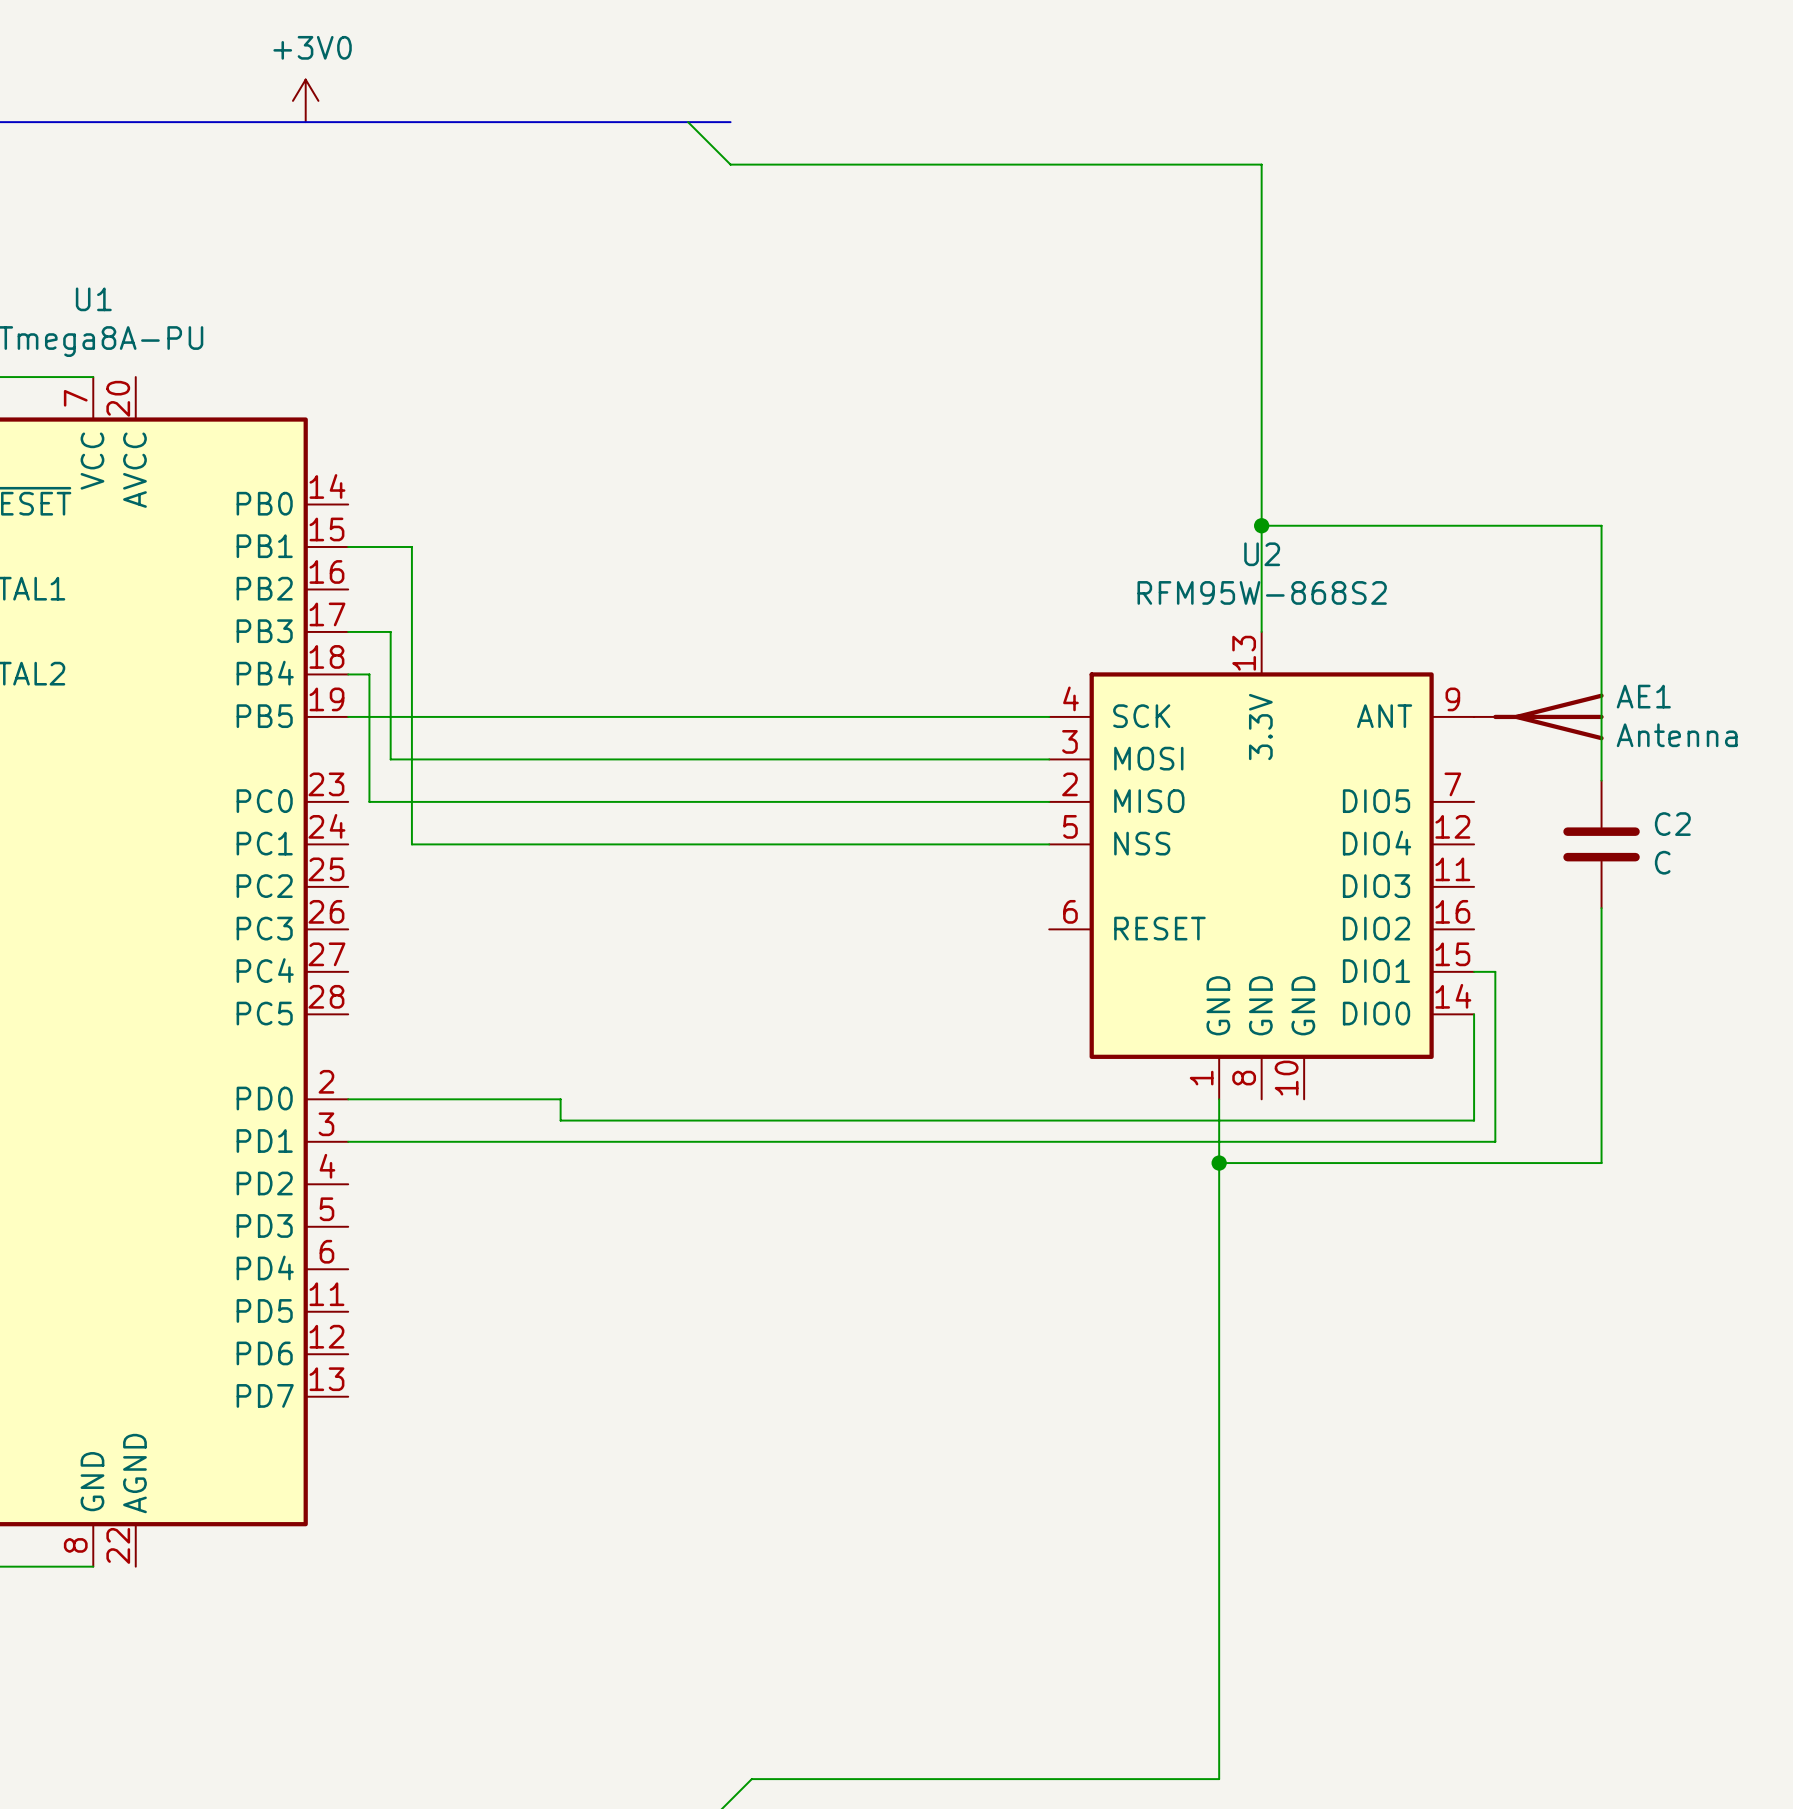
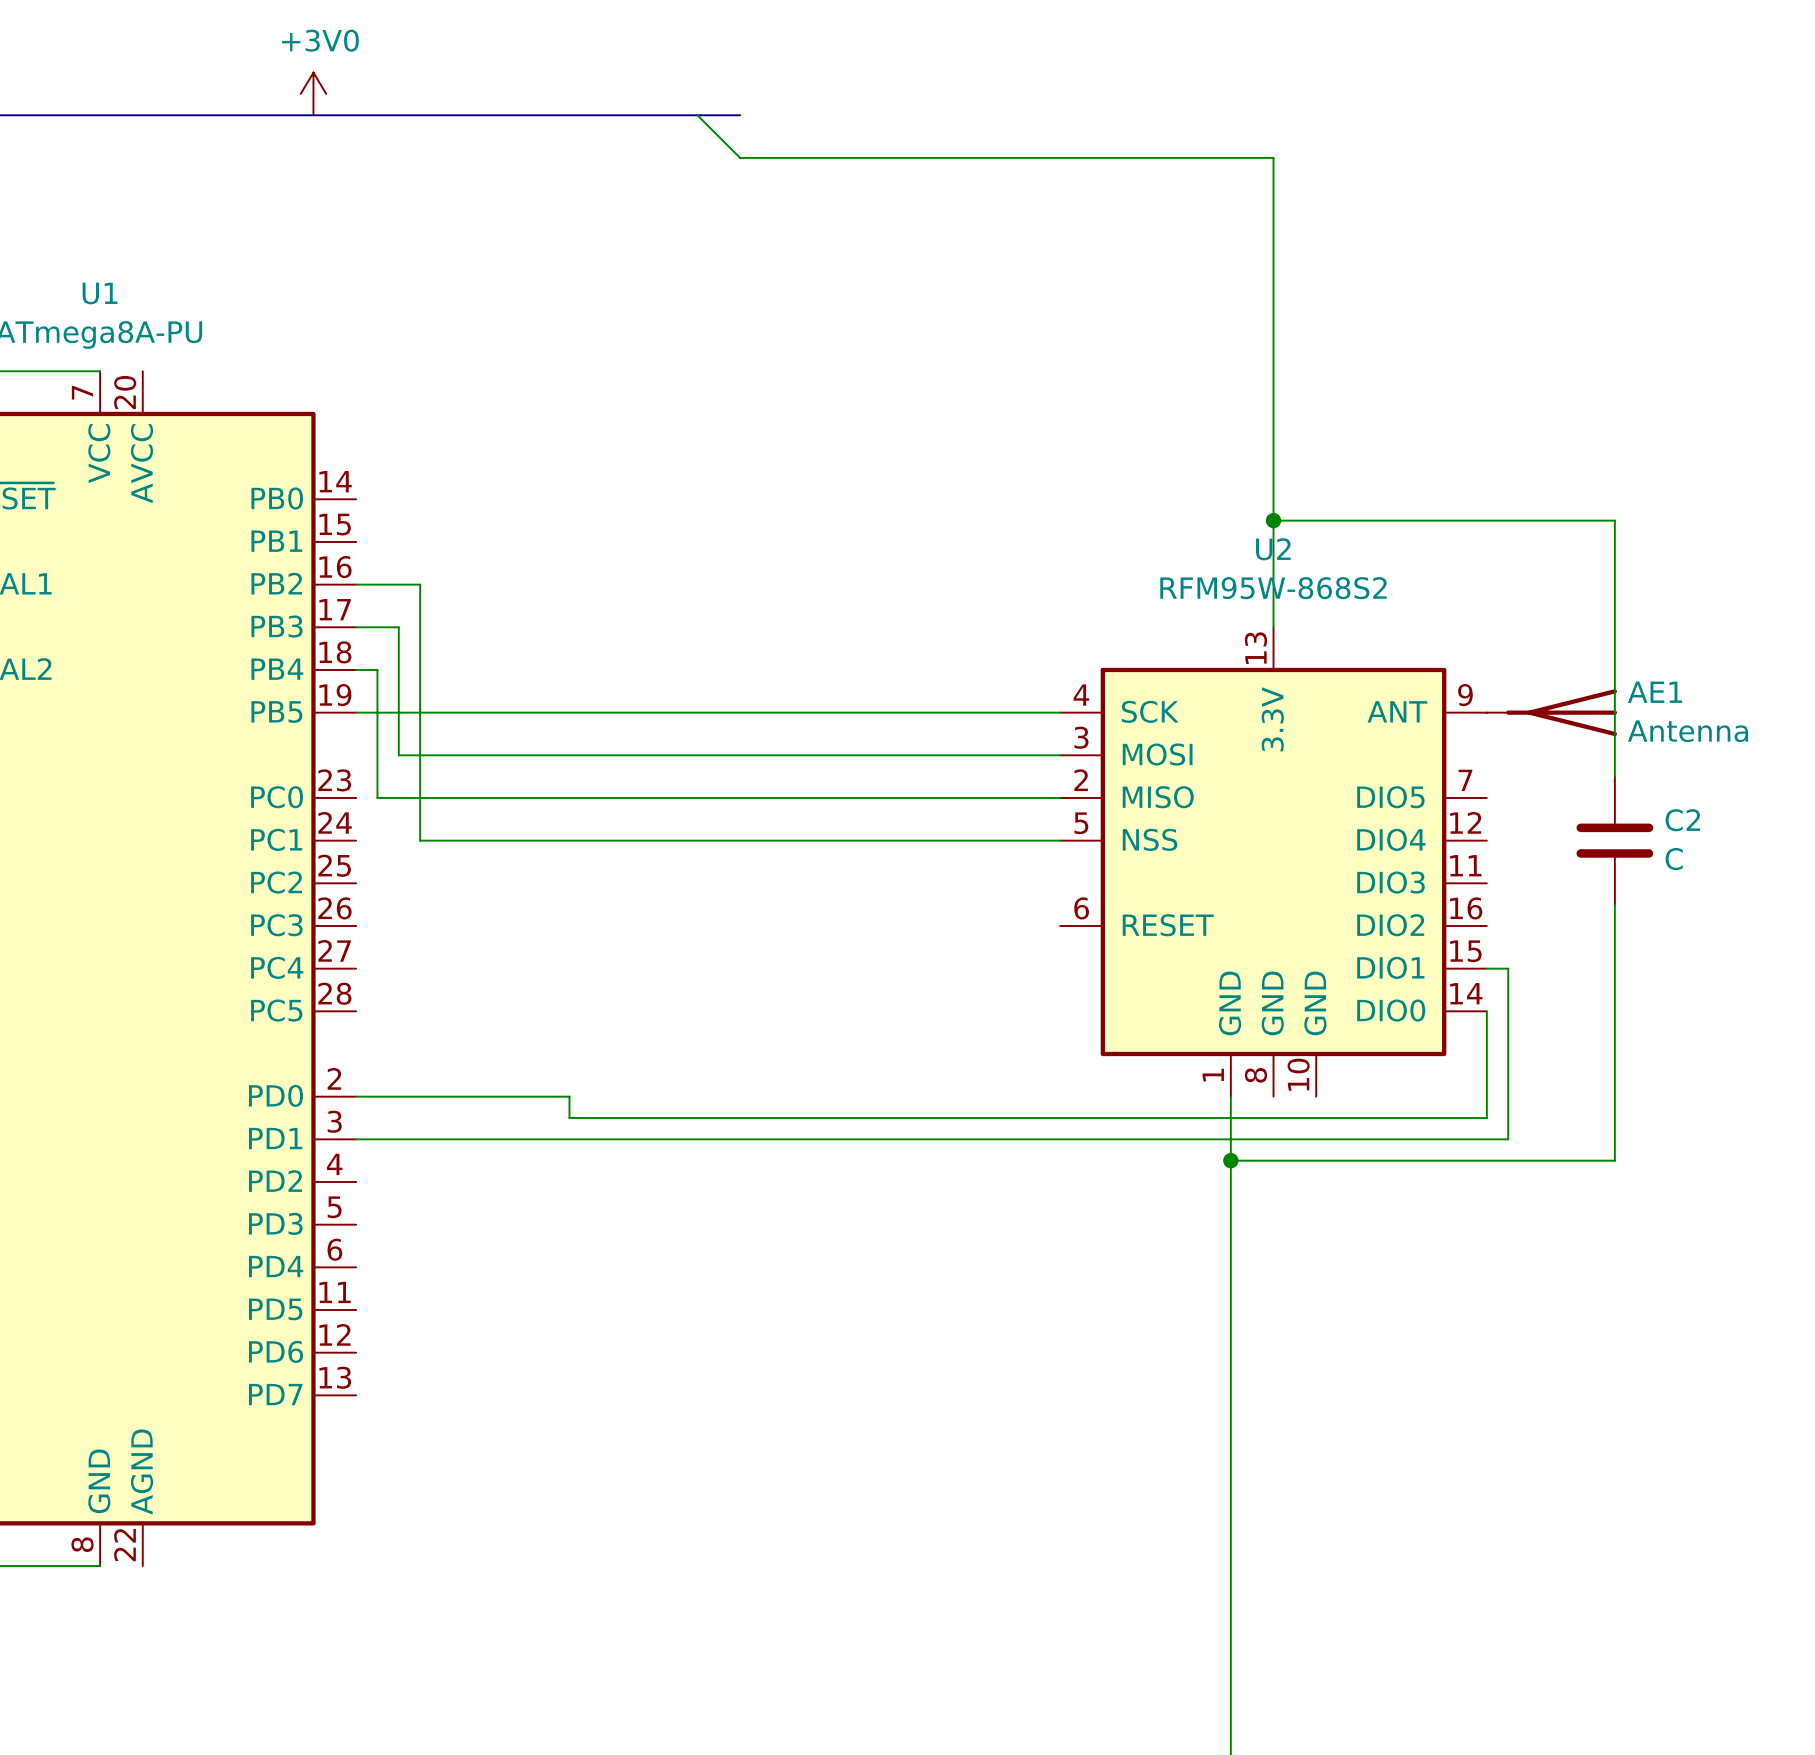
wire: (348, 546) (411, 546) (411, 589) -> (356, 584) (420, 584)

